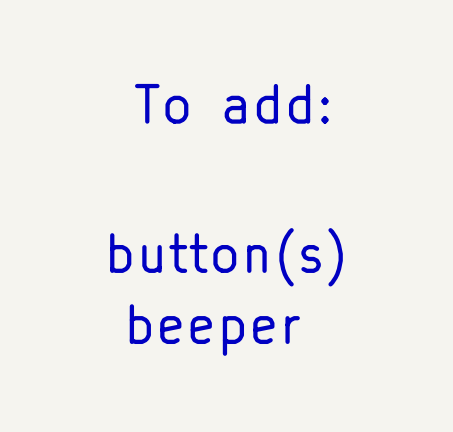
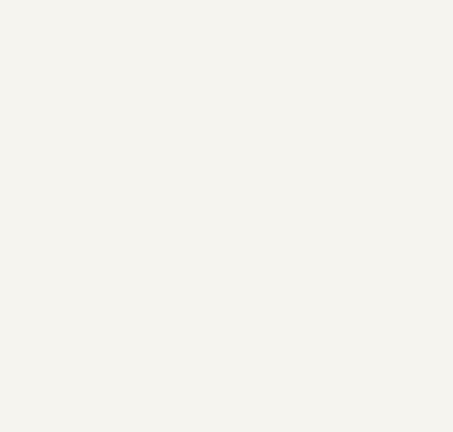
text: To add: (231, 103) -> none
text: button(s) (226, 257) -> none
text: beeper (214, 330) -> none

